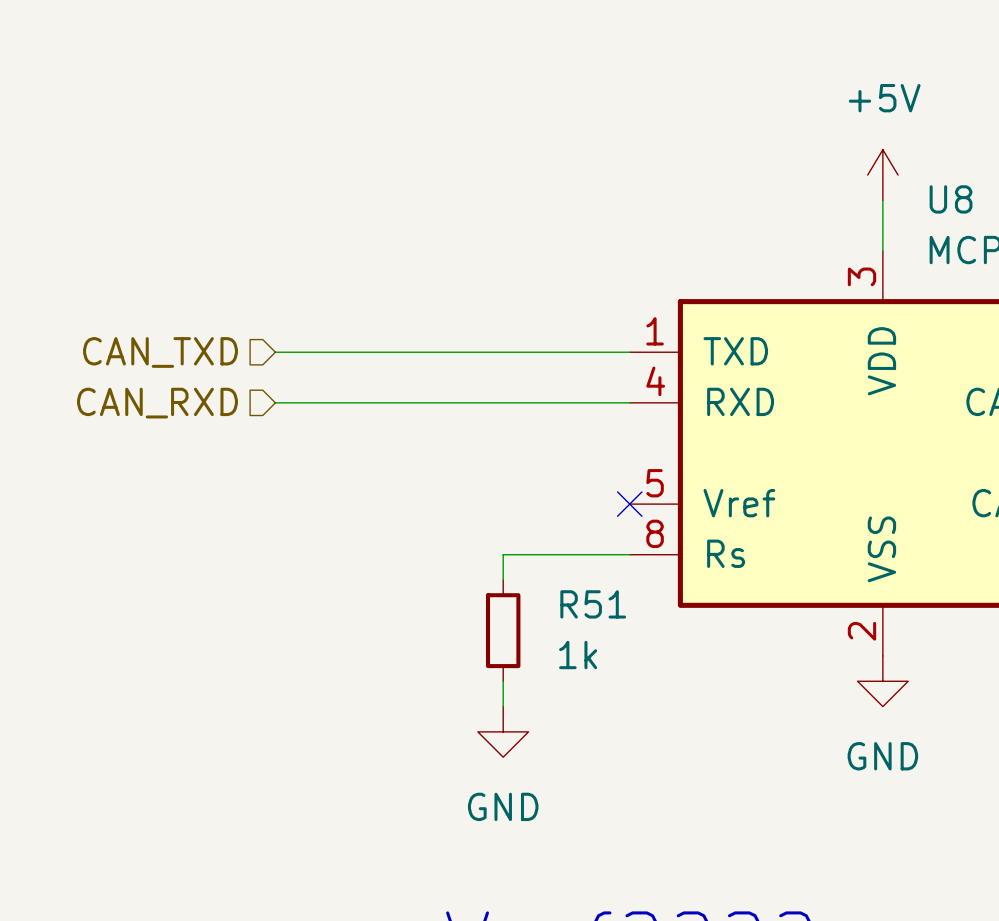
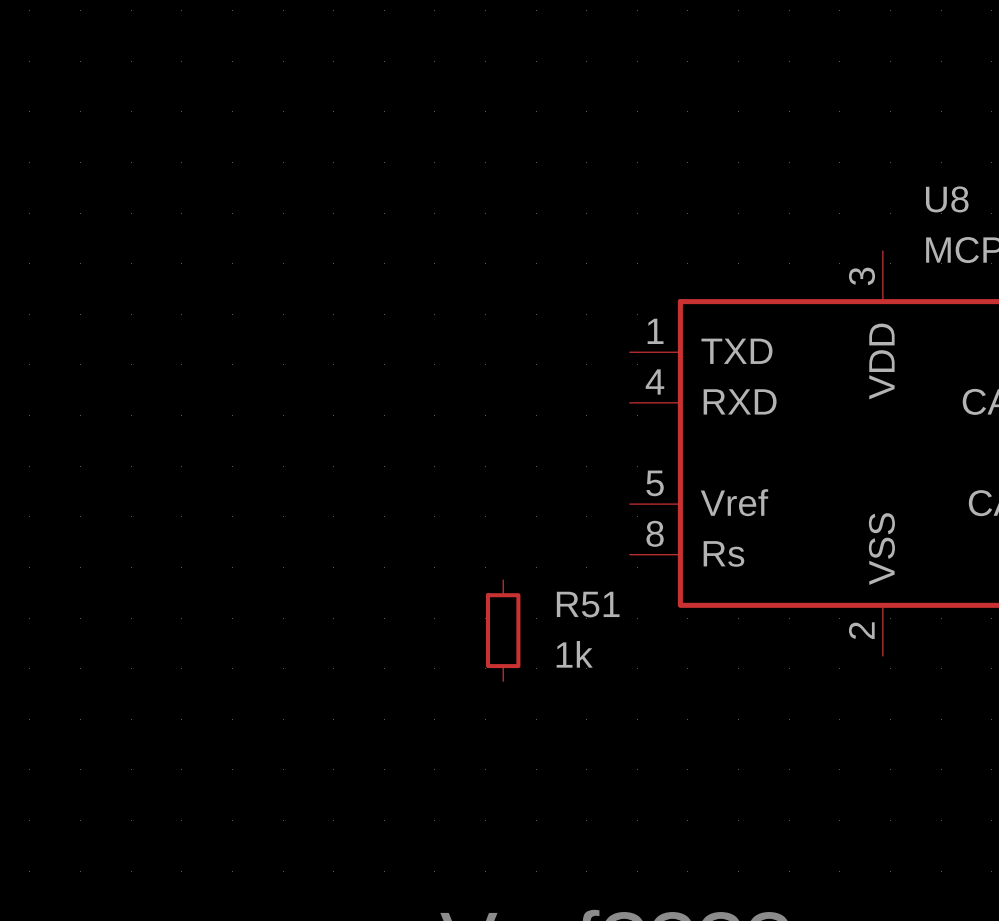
power symbol: +5V (882, 175) -> none
wire: (882, 200) (882, 250) -> none
hierarchical label: CAN_TXD (160, 352) -> none
wire: (275, 352) (629, 352) -> none
wire: (275, 402) (629, 402) -> none
hierarchical label: CAN_RXD (157, 403) -> none
no-connect mark: (629, 504) -> none
wire: (629, 554) (503, 554) (503, 580) -> none
wire: (503, 681) (503, 706) -> none
power symbol: GND (882, 681) -> none
power symbol: GND (503, 731) -> none

